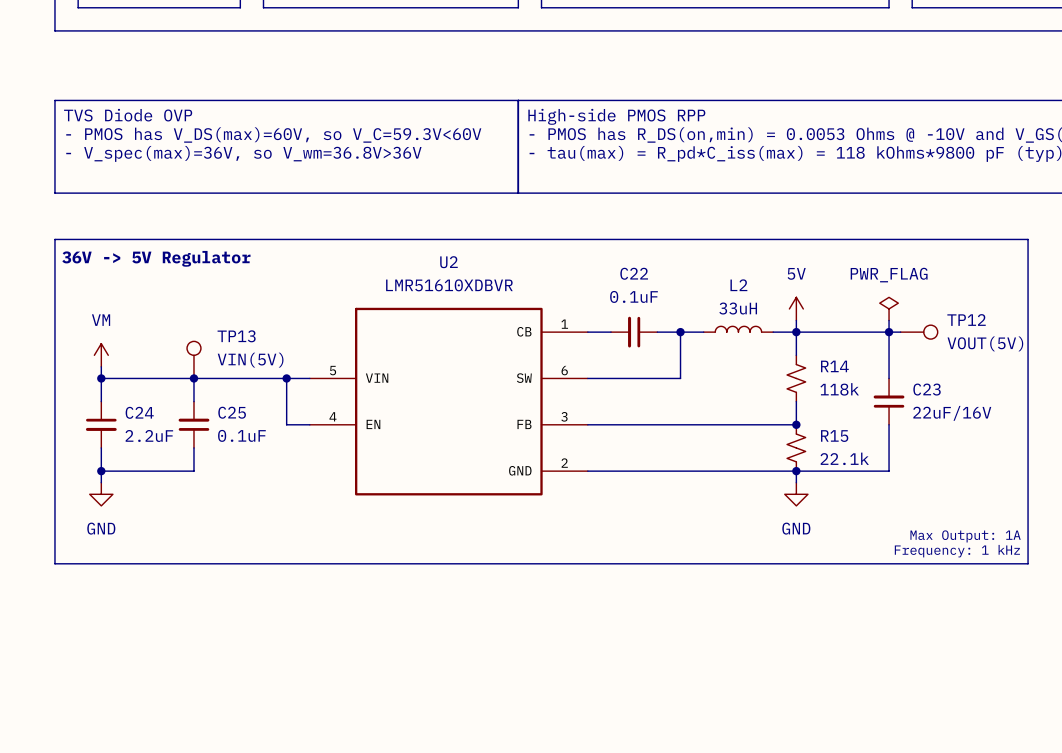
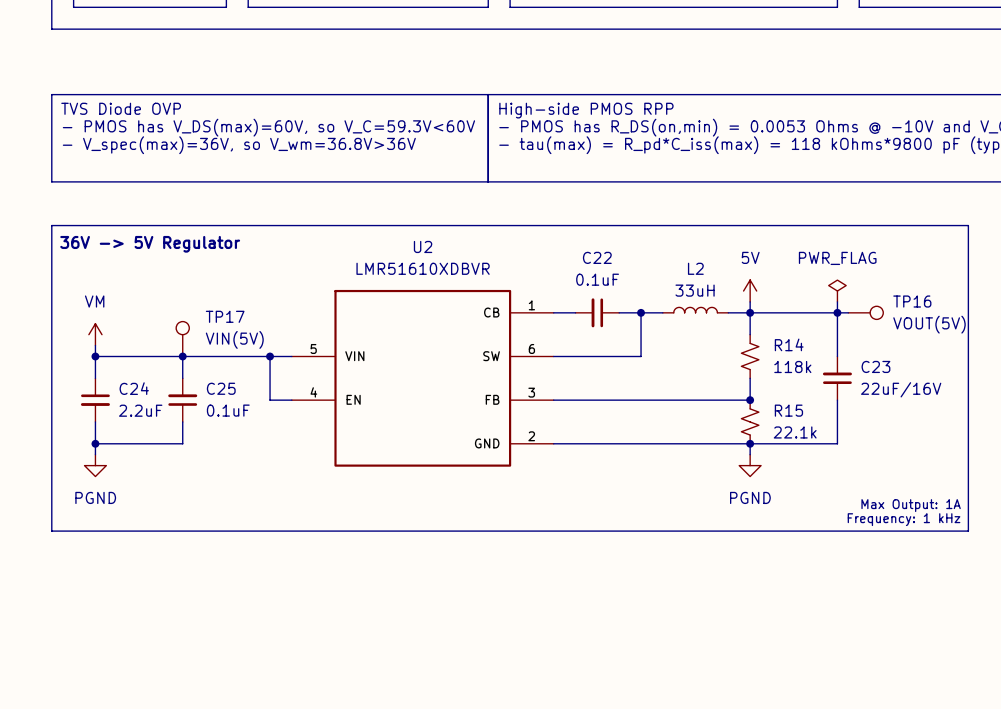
TP12 name: TP12 (966, 320) -> TP16 (912, 301)
TP13 name: TP13 (236, 336) -> TP17 (225, 316)
power symbol: GND (101, 494) -> PGND (95, 465)
power symbol: GND (796, 494) -> PGND (750, 465)

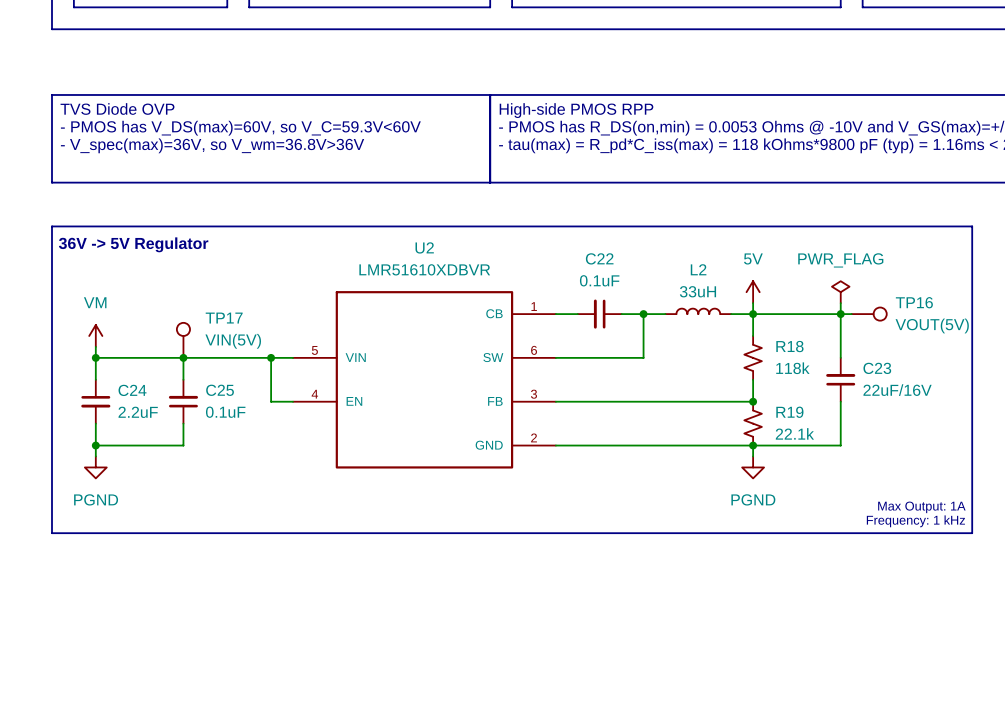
R14 name: R14 (789, 344) -> R18 (789, 346)
R15 name: R15 (788, 410) -> R19 (789, 412)

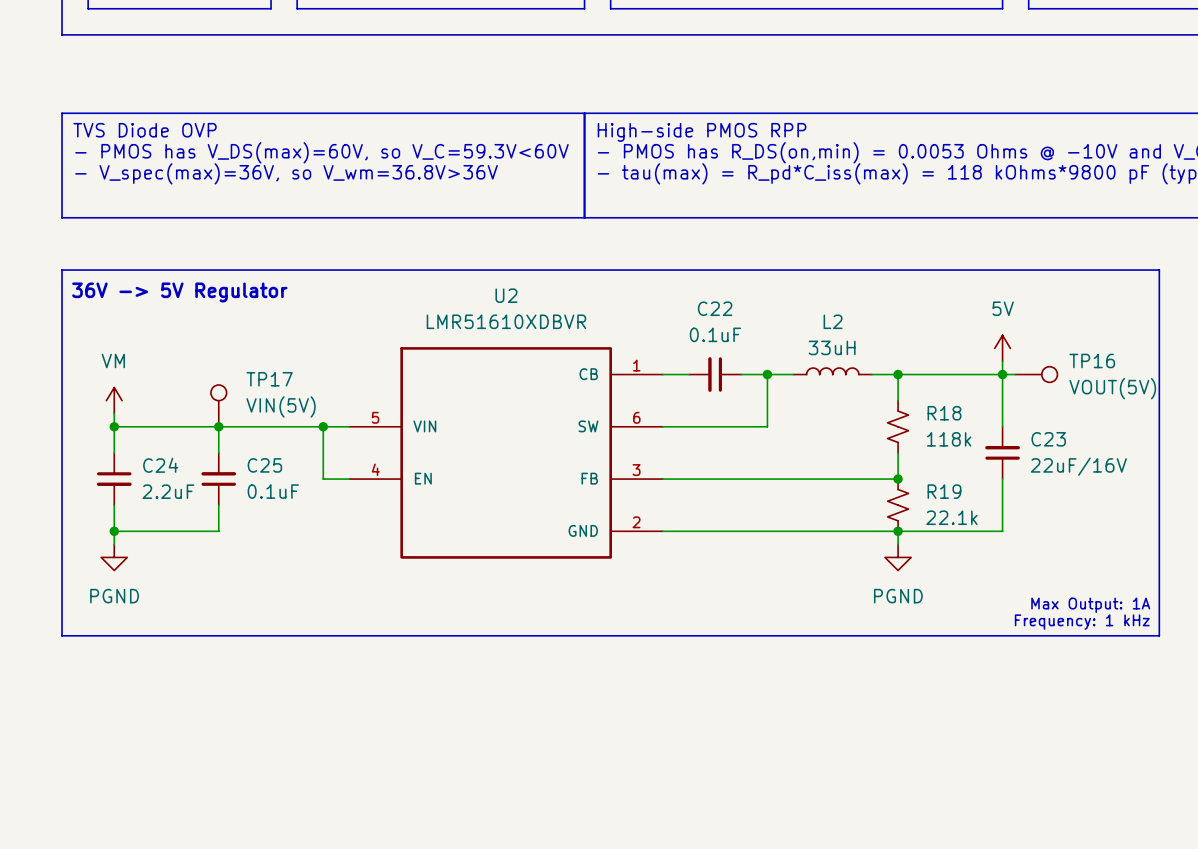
power symbol: 5V (753, 292) -> none
power symbol: PWR_FLAG (840, 292) -> 5V (1002, 348)
wire: (753, 303) (753, 314) -> none

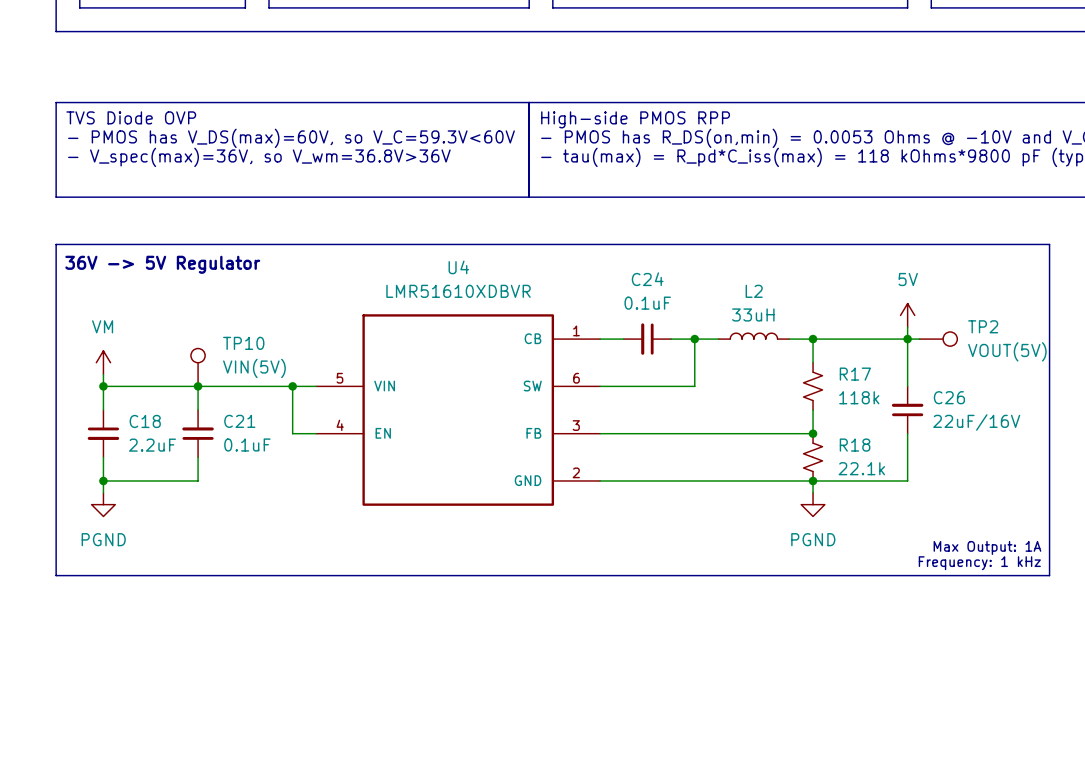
U2 name: U2 (506, 295) -> U4 (458, 267)
C22 name: C22 (715, 308) -> C24 (647, 279)
TP16 name: TP16 (1092, 360) -> TP2 (983, 326)
TP17 name: TP17 (269, 379) -> TP10 (243, 343)
R18 name: R18 (944, 413) -> R17 (855, 374)
C23 name: C23 (1048, 439) -> C26 (949, 397)
C24 name: C24 (160, 465) -> C18 (145, 421)
C25 name: C25 (264, 465) -> C21 (239, 421)
R19 name: R19 (944, 491) -> R18 (855, 445)

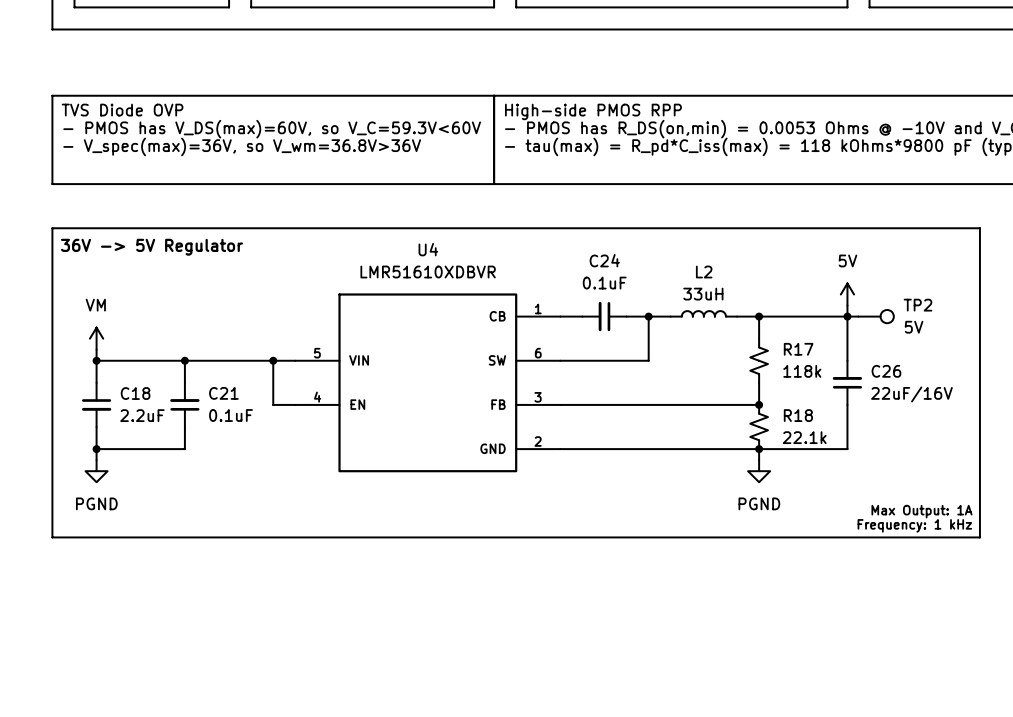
TP2 value: VOUT(5V) (1007, 351) -> 5V (914, 327)
TP10: VIN(5V) (198, 367) -> none

